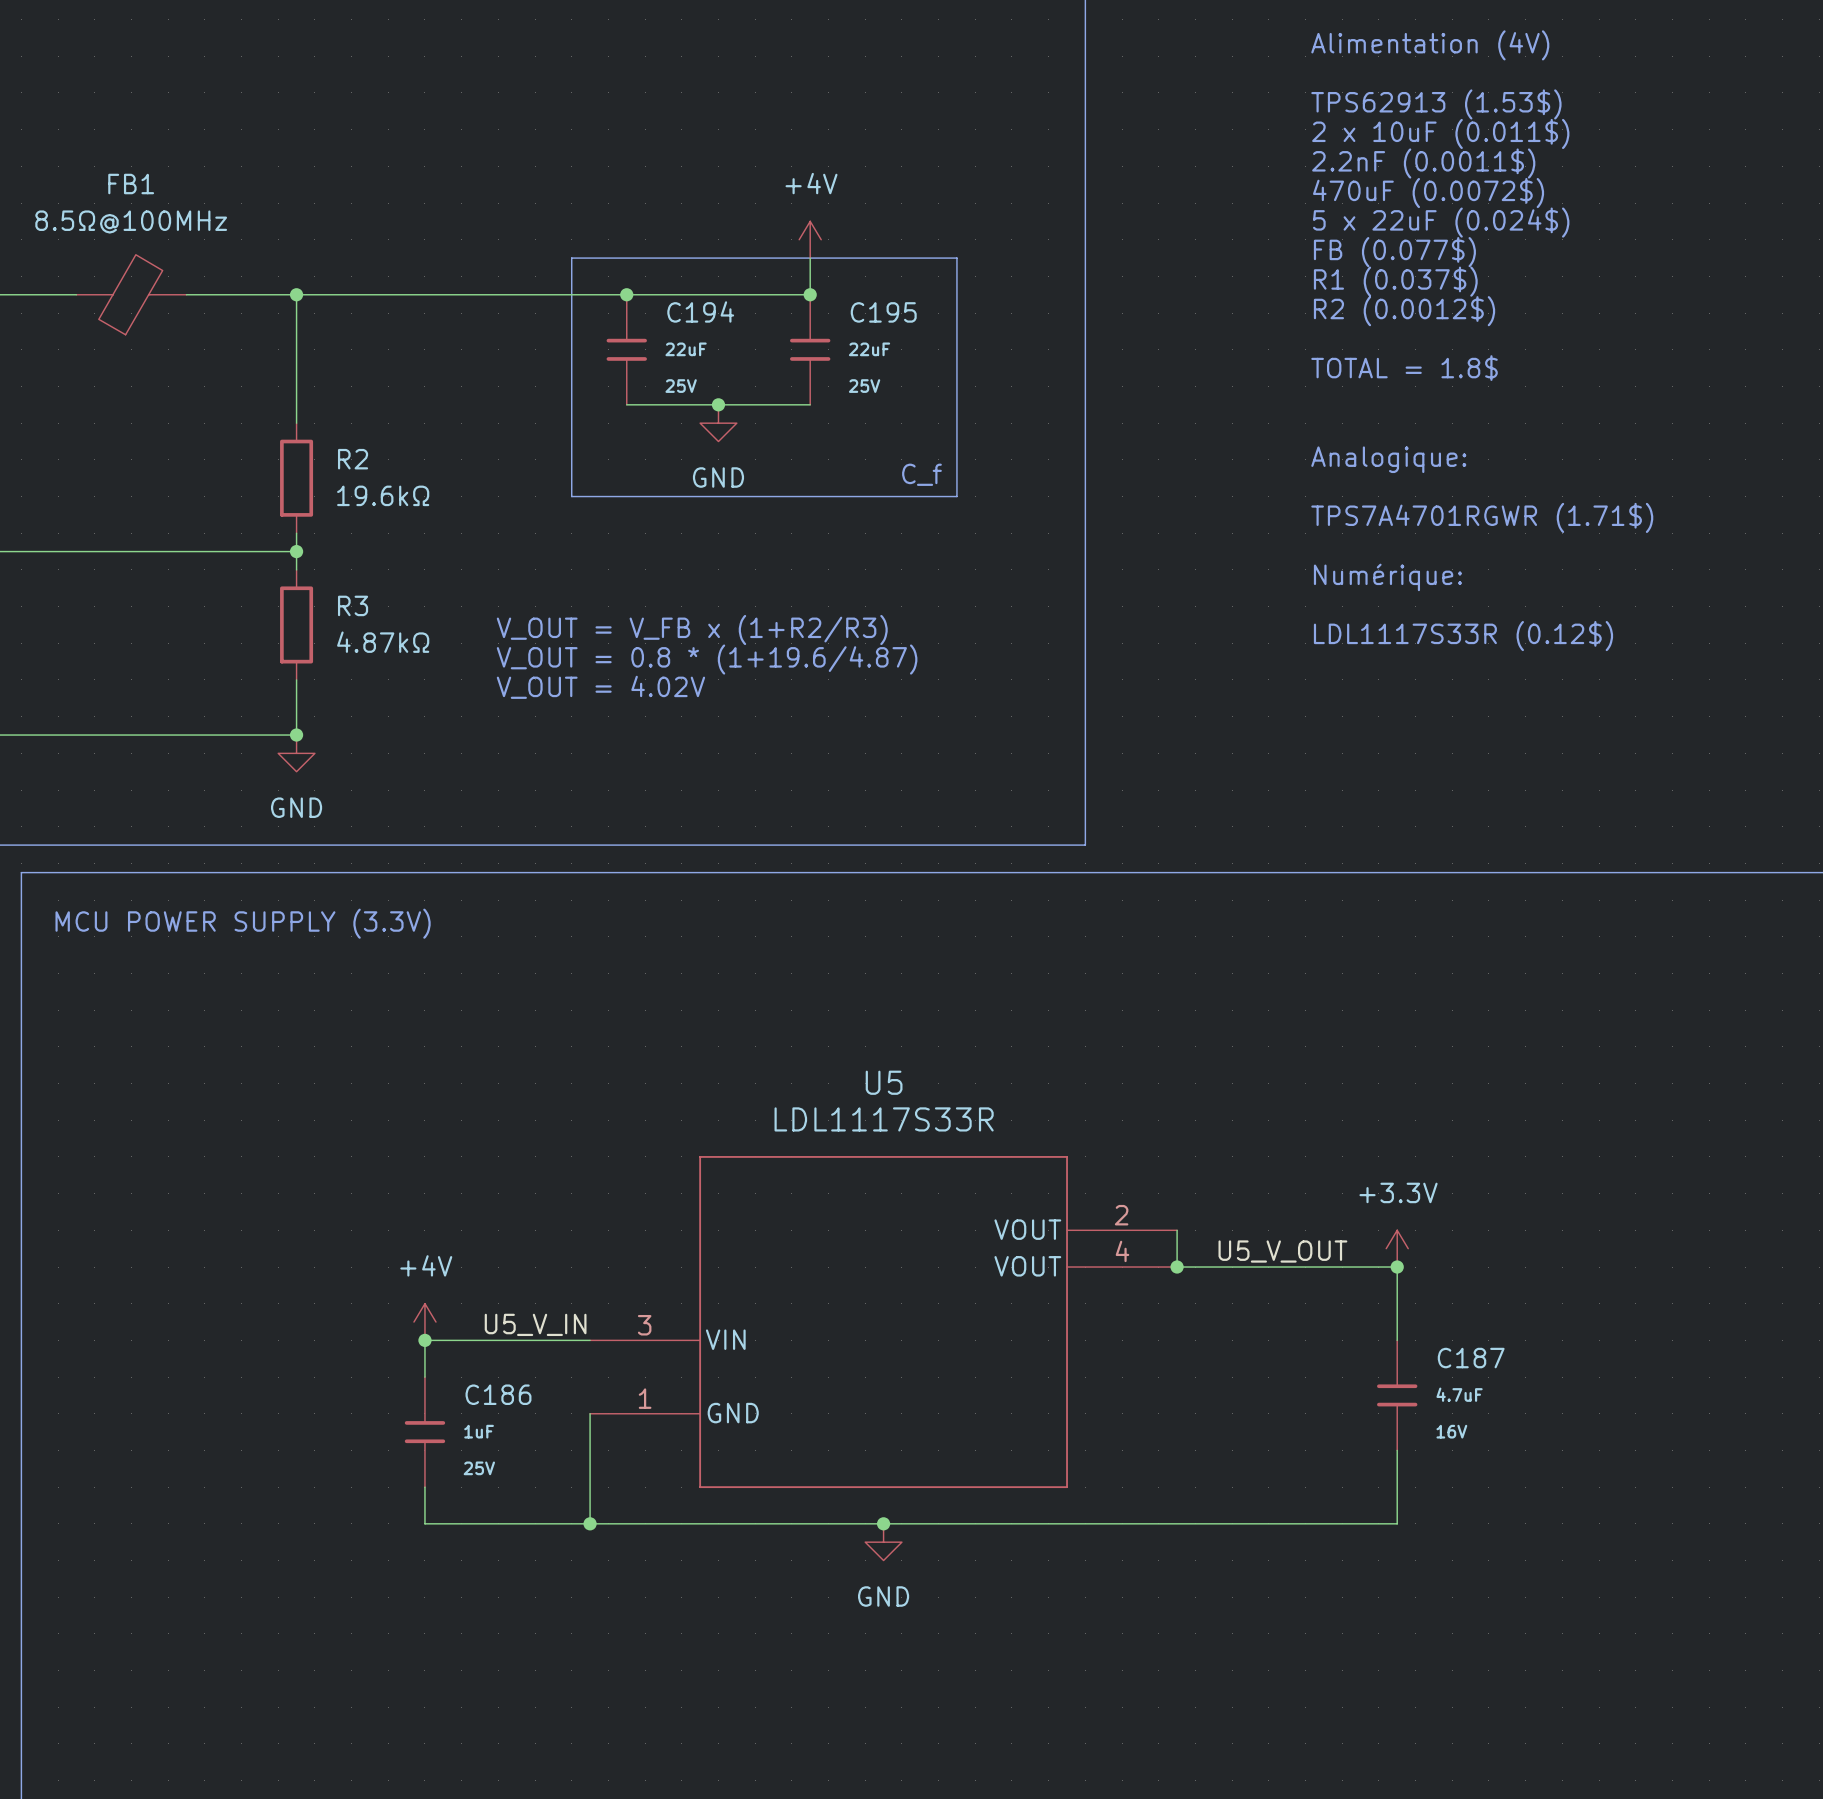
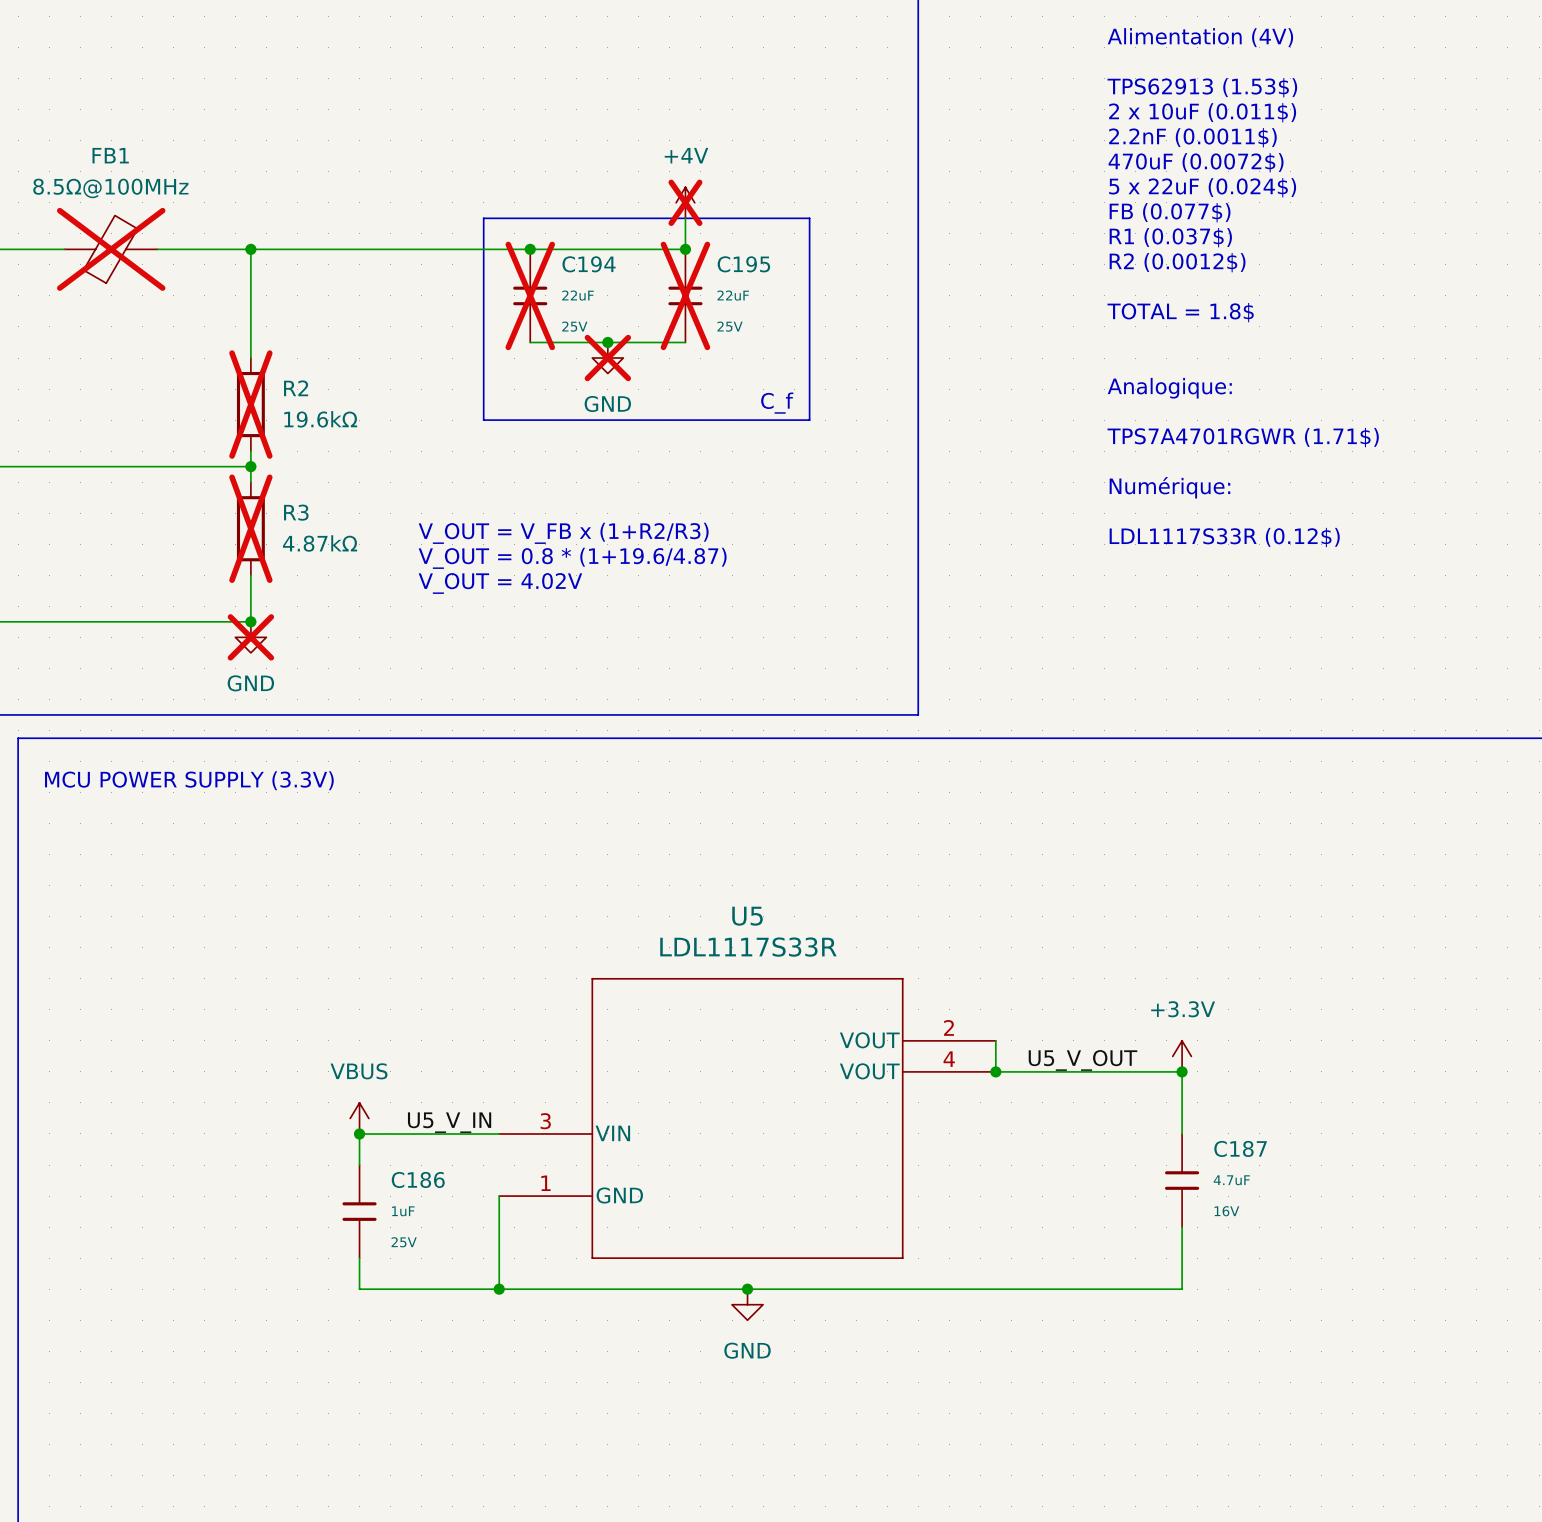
power symbol do-not-place cross: none -> (685, 202)
FB1 do-not-place cross: none -> (111, 249)
C194 do-not-place cross: none -> (530, 295)
C195 do-not-place cross: none -> (685, 295)
power symbol do-not-place cross: none -> (607, 358)
R2 do-not-place cross: none -> (250, 404)
R3 do-not-place cross: none -> (250, 528)
power symbol do-not-place cross: none -> (250, 637)
power symbol: +4V (424, 1322) -> VBUS (359, 1118)

